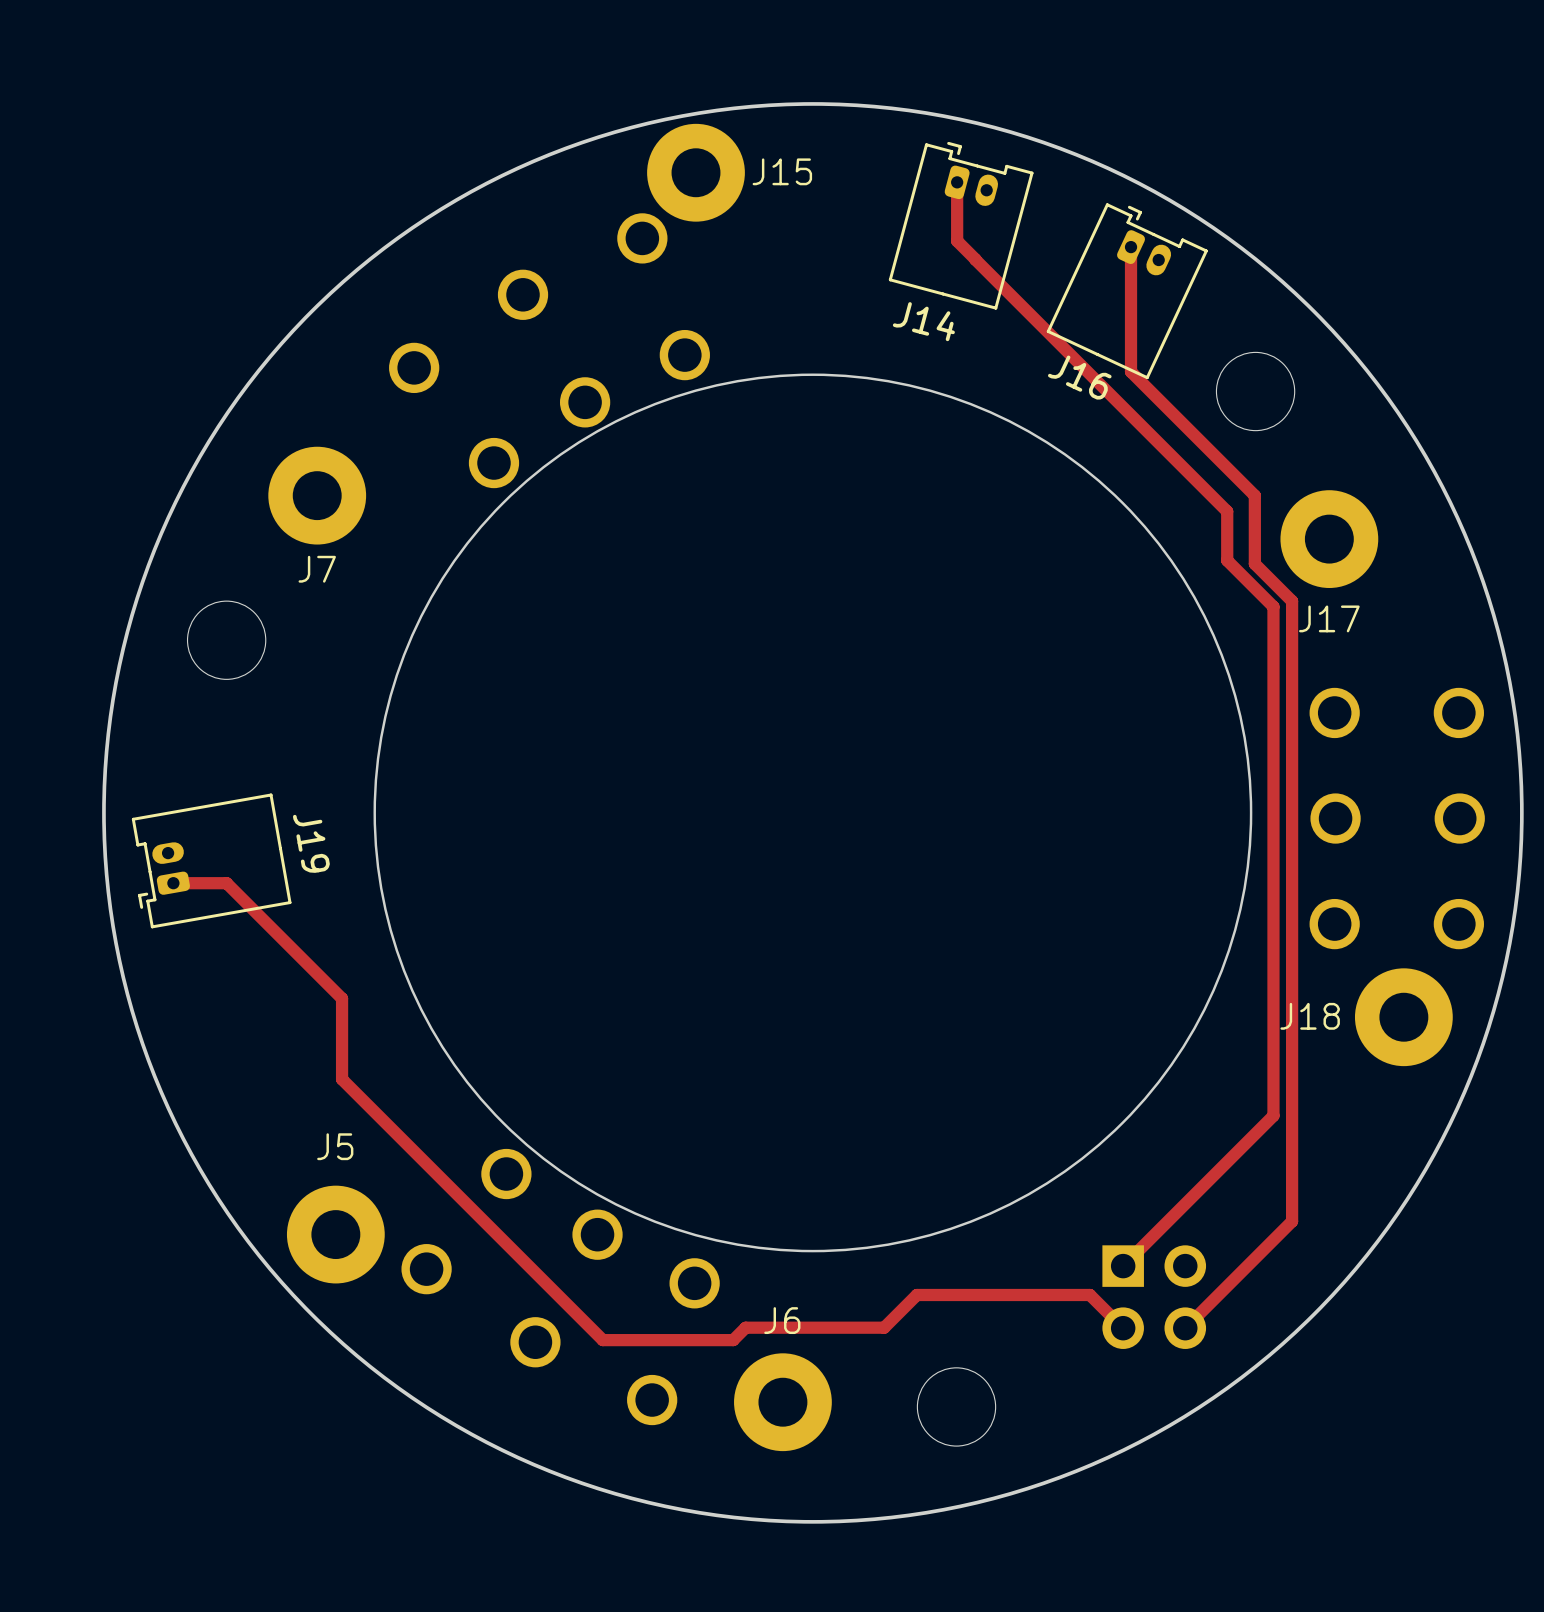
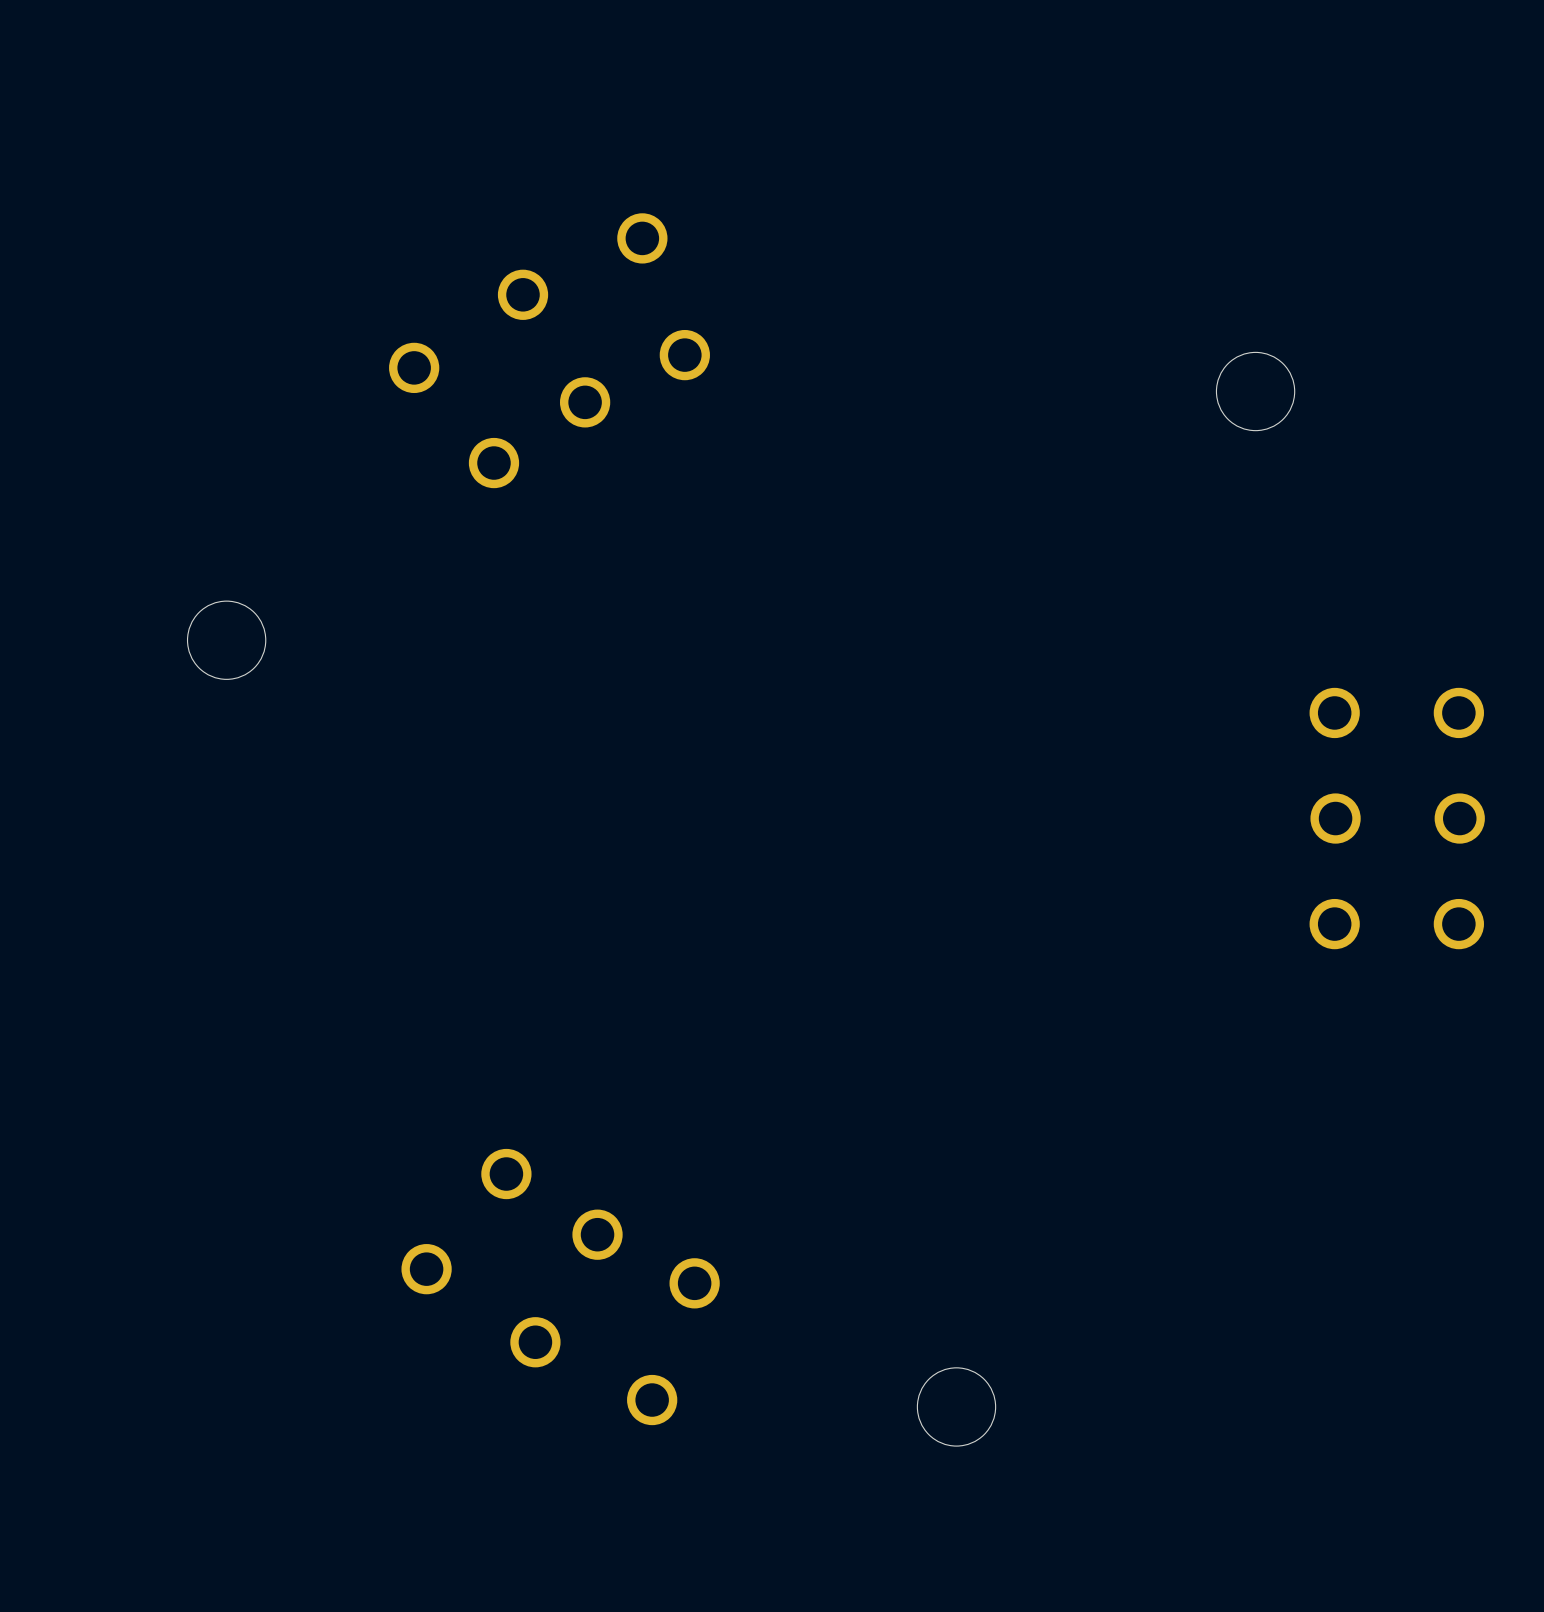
round board edge: [102, 102, 1524, 1524] -> none
J15: (696, 172) -> none
track: (957, 182) (957, 241) (975, 259) -> none
J14: (961, 225) -> none
track: (1131, 247) (1131, 371) (1254, 495) (1254, 563) (1292, 601) (1292, 1221) (1185, 1328) -> none
track: (975, 259) (1227, 511) (1227, 560) (1273, 606) (1273, 1115) (1123, 1266) -> none
J16: (1127, 291) -> none
round board edge: [373, 373, 1253, 1253] -> none
J7: (317, 495) -> none
J17: (1329, 539) -> none
J19: (211, 860) -> none
track: (173, 883) (226, 883) (342, 998) (342, 1079) (602, 1340) (733, 1340) (745, 1327) (884, 1327) (916, 1294) (1089, 1294) (1123, 1328) -> none
J18: (1403, 1017) -> none
J5: (335, 1234) -> none
part: (1154, 1297) -> none
J6: (782, 1402) -> none

